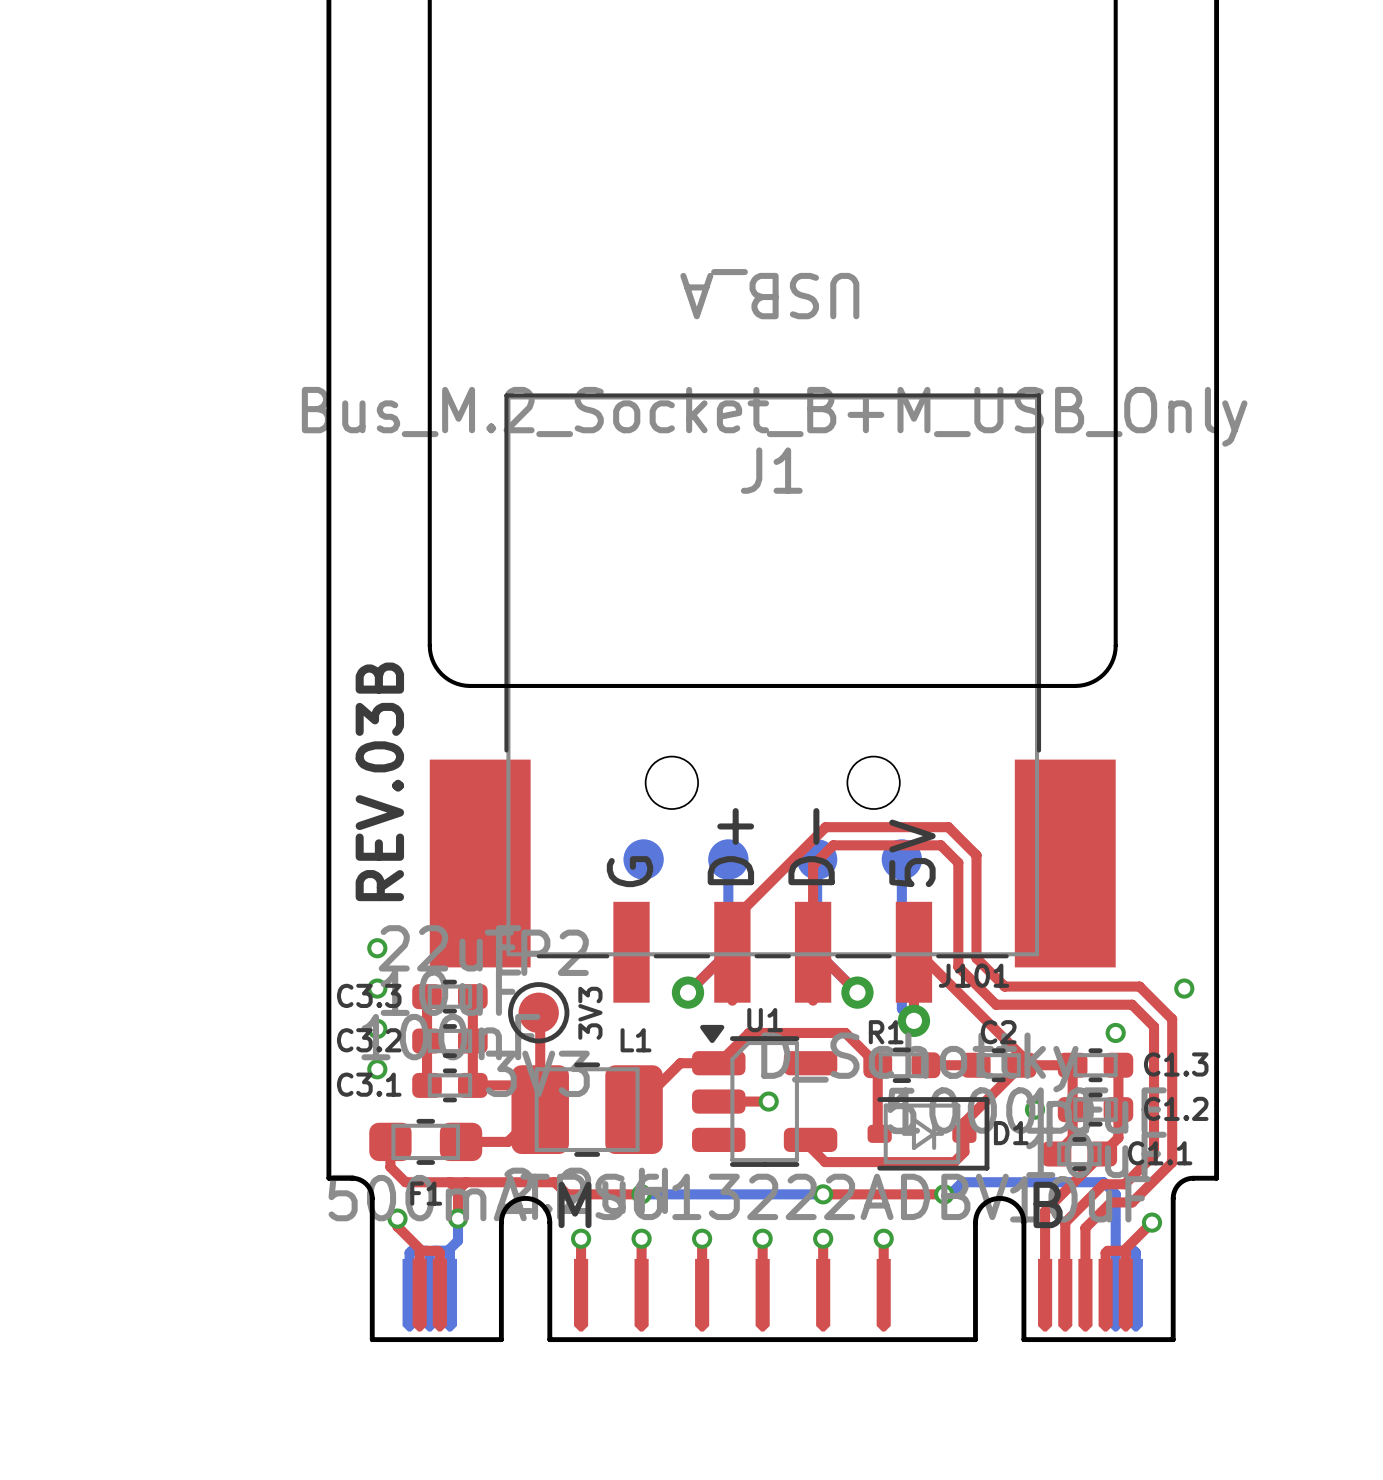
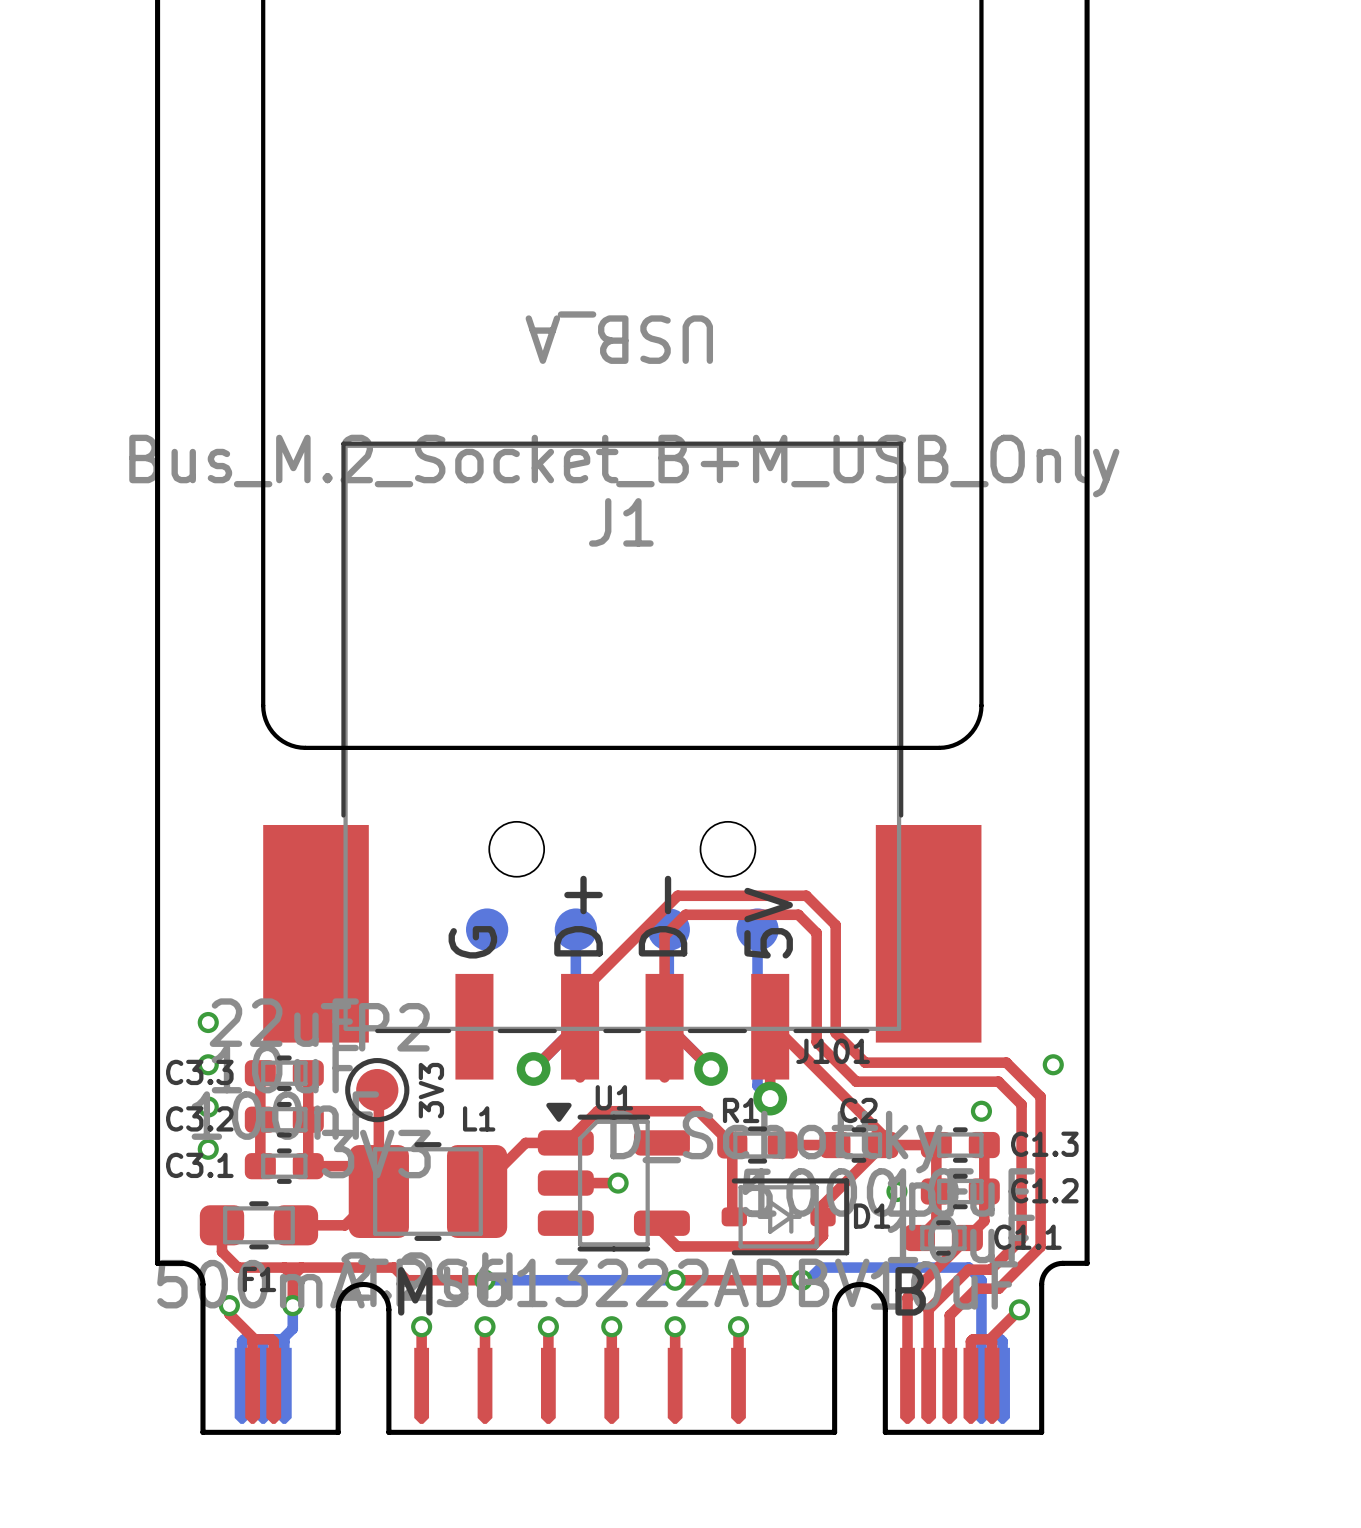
text: REV.03B (379, 781) -> none

